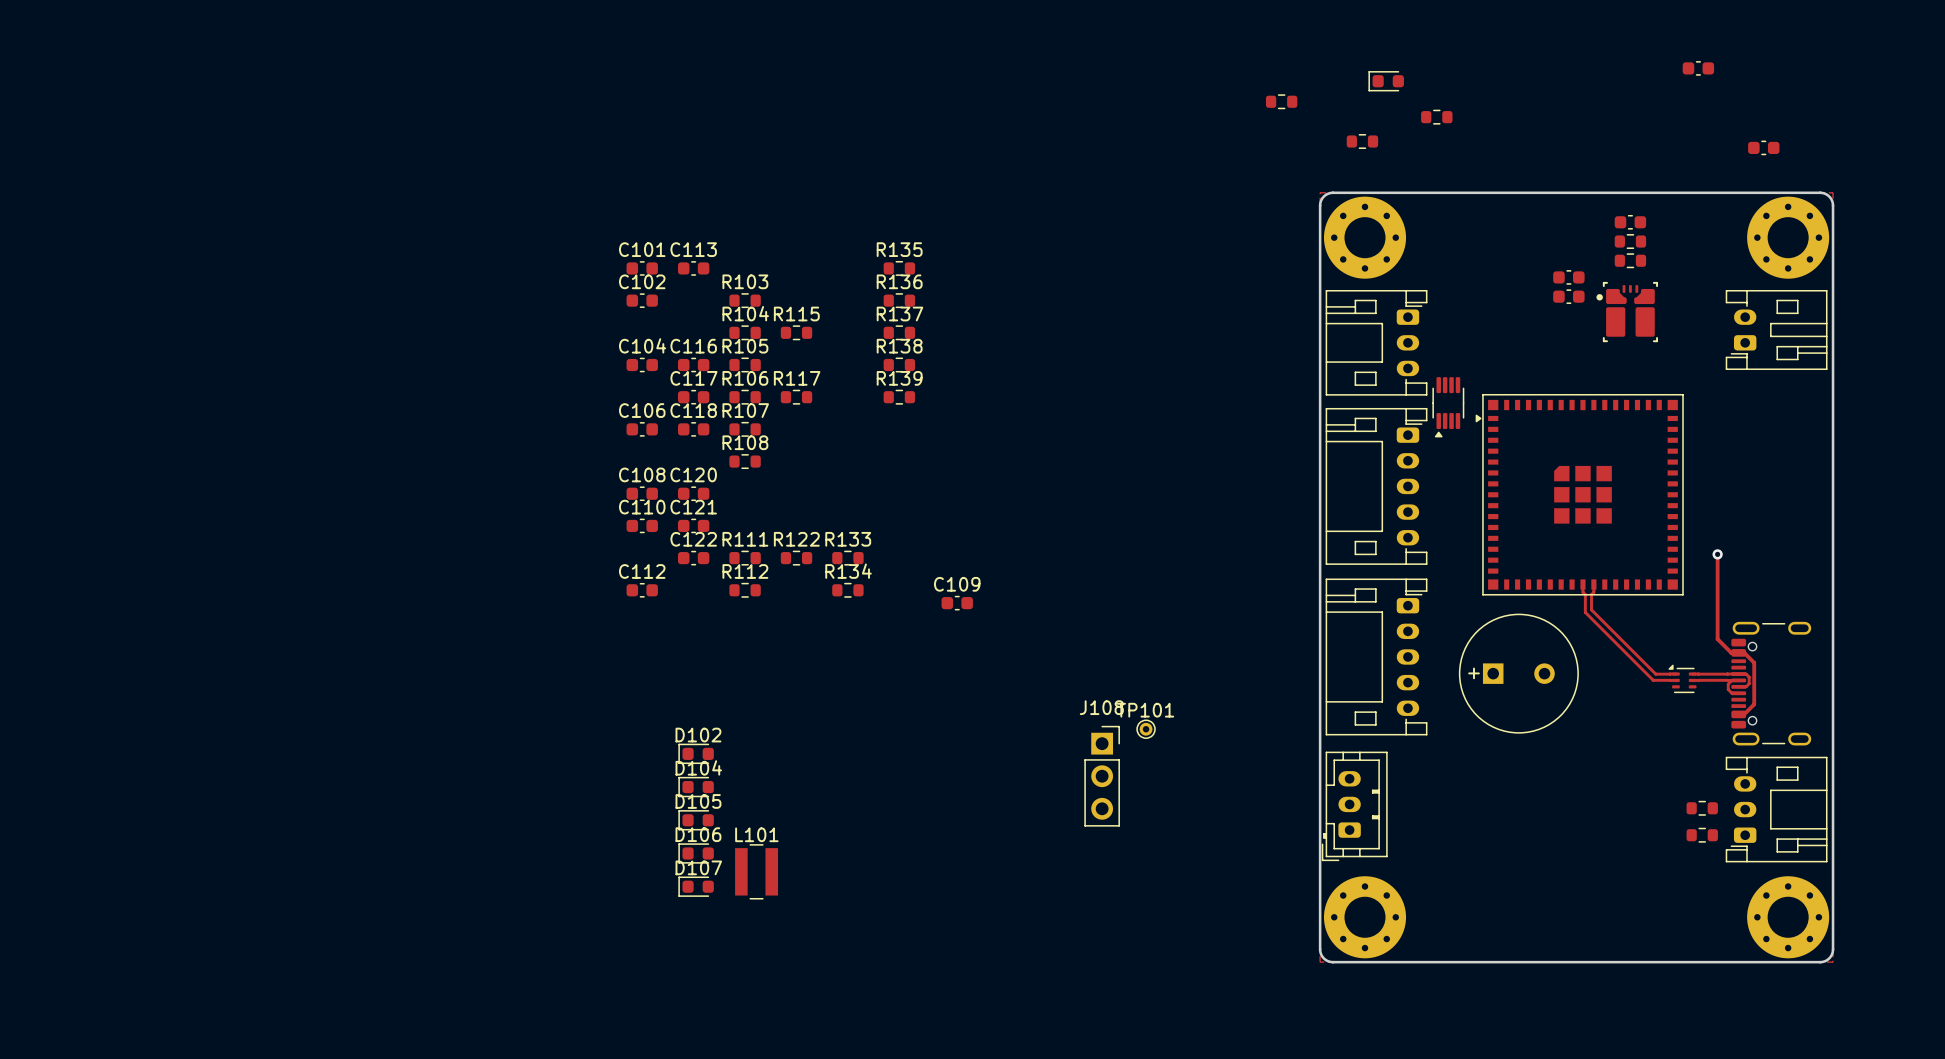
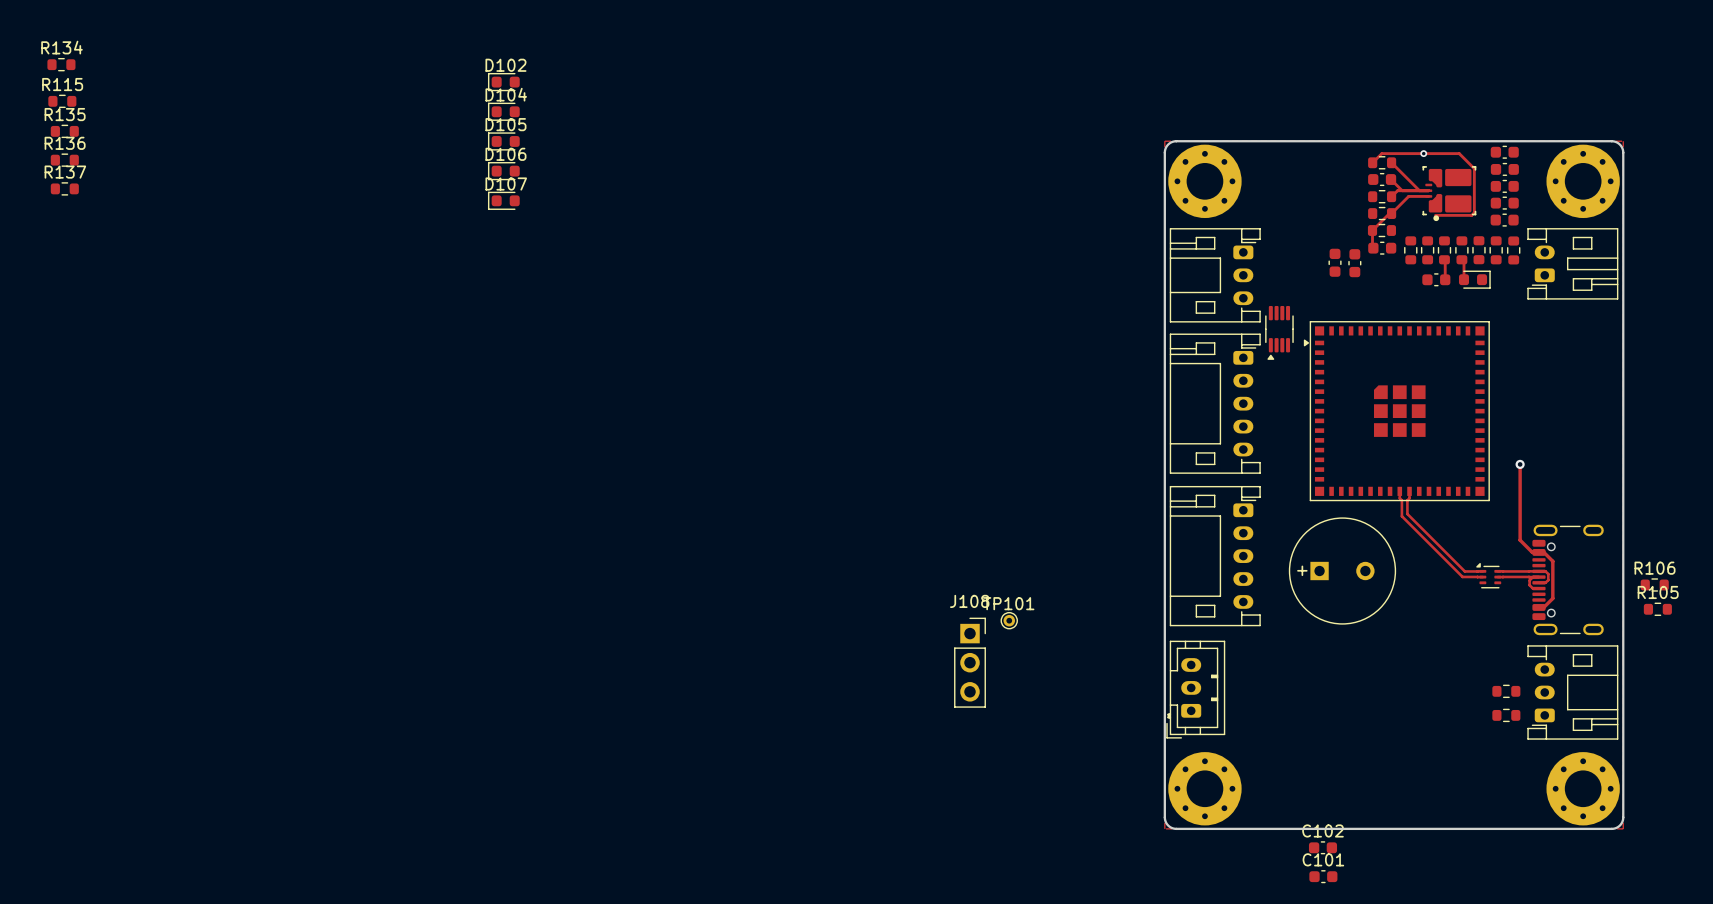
part: (1698, 68) -> none
part: (1386, 81) -> none
part: (1281, 101) -> none
part: (1436, 117) -> none
part: (1362, 141) -> none
part: (1763, 147) -> none
part: none -> (1504, 152)
via: none -> (1423, 153)
track: none -> (1372, 162) (1381, 153) (1459, 153) (1474, 168) (1474, 212) (1471, 215) (1435, 215)
part: none -> (1382, 162)
track: none -> (1391, 162) (1419, 190)
part: (1630, 222) -> none
part: none -> (1504, 169)
part: none -> (1382, 179)
track: none -> (1391, 179) (1402, 190)
part: (1630, 241) -> none
part: none -> (1504, 186)
track: none -> (1428, 190) (1397, 190) (1391, 196)
part: none -> (1449, 193)
part: none -> (1382, 196)
track: none -> (1428, 196) (1408, 196) (1389, 213) (1372, 230) (1373, 248)
part: (1630, 260) -> none
part: none -> (1504, 203)
C101 position: (642, 268) -> (1323, 876)
C113: (693, 268) -> none
R135 position: (899, 268) -> (64, 131)
part footprint: [1553, 270, 1585, 285] -> [1368, 206, 1397, 221]
part footprint: [1596, 281, 1658, 343] -> [1437, 236, 1452, 265]
part: none -> (1504, 220)
part footprint: [1553, 289, 1585, 304] -> [1367, 223, 1397, 238]
C102 position: (642, 300) -> (1322, 847)
R103: (745, 300) -> none
R136 position: (899, 300) -> (64, 160)
part: none -> (1382, 248)
part: none -> (1410, 250)
part: none -> (1427, 250)
part: none -> (1461, 250)
part: none -> (1478, 250)
part: none -> (1496, 250)
part: none -> (1513, 250)
track: none -> (1444, 259) (1445, 279)
track: none -> (1461, 259) (1463, 261) (1463, 279)
part: none -> (1335, 262)
part: none -> (1354, 263)
R104: (745, 332) -> none
R115 position: (796, 332) -> (62, 101)
R137 position: (899, 332) -> (64, 188)
part: none -> (1436, 279)
part: none -> (1474, 279)
C104: (642, 365) -> none
C116: (693, 365) -> none
R105 position: (745, 365) -> (1657, 609)
R138: (899, 365) -> none
C117: (693, 397) -> none
R106 position: (745, 397) -> (1654, 584)
R117: (796, 397) -> none
R139: (899, 397) -> none
C106: (642, 429) -> none
C118: (693, 429) -> none
R107: (745, 429) -> none
R108: (745, 461) -> none
C108: (642, 493) -> none
C120: (693, 493) -> none
C110: (642, 525) -> none
C121: (693, 525) -> none
C122: (693, 558) -> none
R111: (745, 558) -> none
R122: (796, 558) -> none
R133: (847, 558) -> none
C112: (642, 590) -> none
R112: (745, 590) -> none
R134 position: (847, 590) -> (61, 64)
C109: (957, 603) -> none
D102 position: (696, 753) -> (503, 82)
D104 position: (696, 787) -> (503, 111)
D105 position: (696, 820) -> (503, 141)
D106 position: (696, 853) -> (503, 171)
L101: (756, 871) -> none
D107 position: (696, 886) -> (503, 200)

